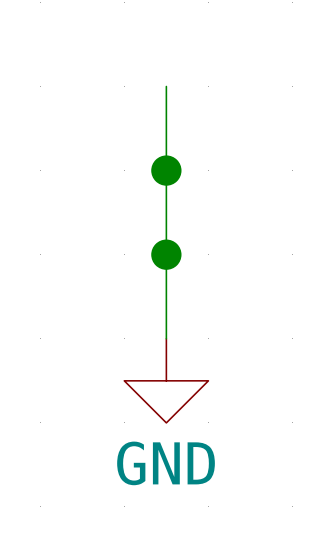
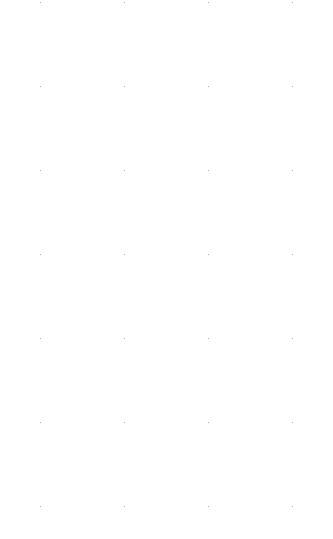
wire: (166, 86) (166, 338) -> none
junction: (166, 170) -> none
junction: (166, 254) -> none
power symbol: GND (166, 380) -> none

